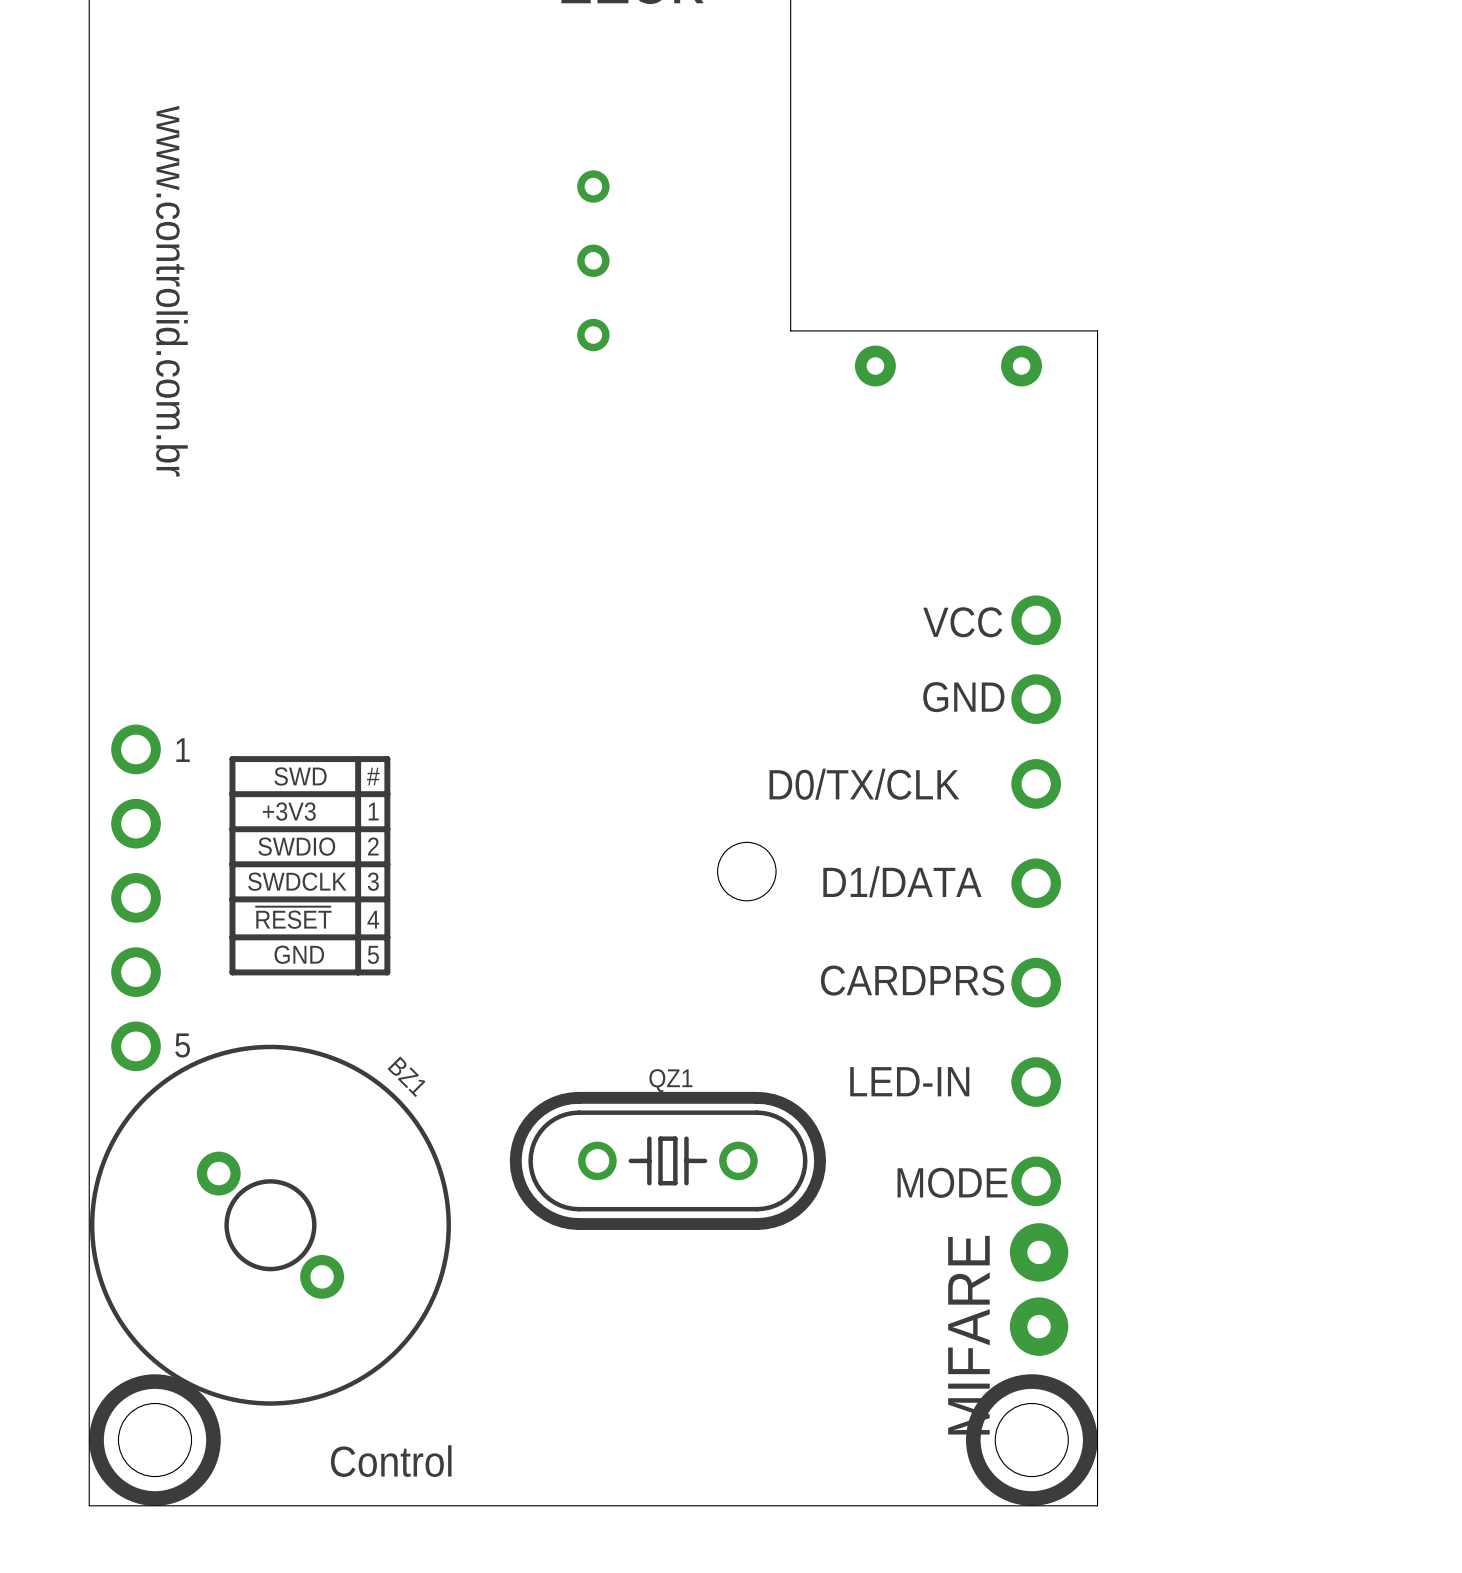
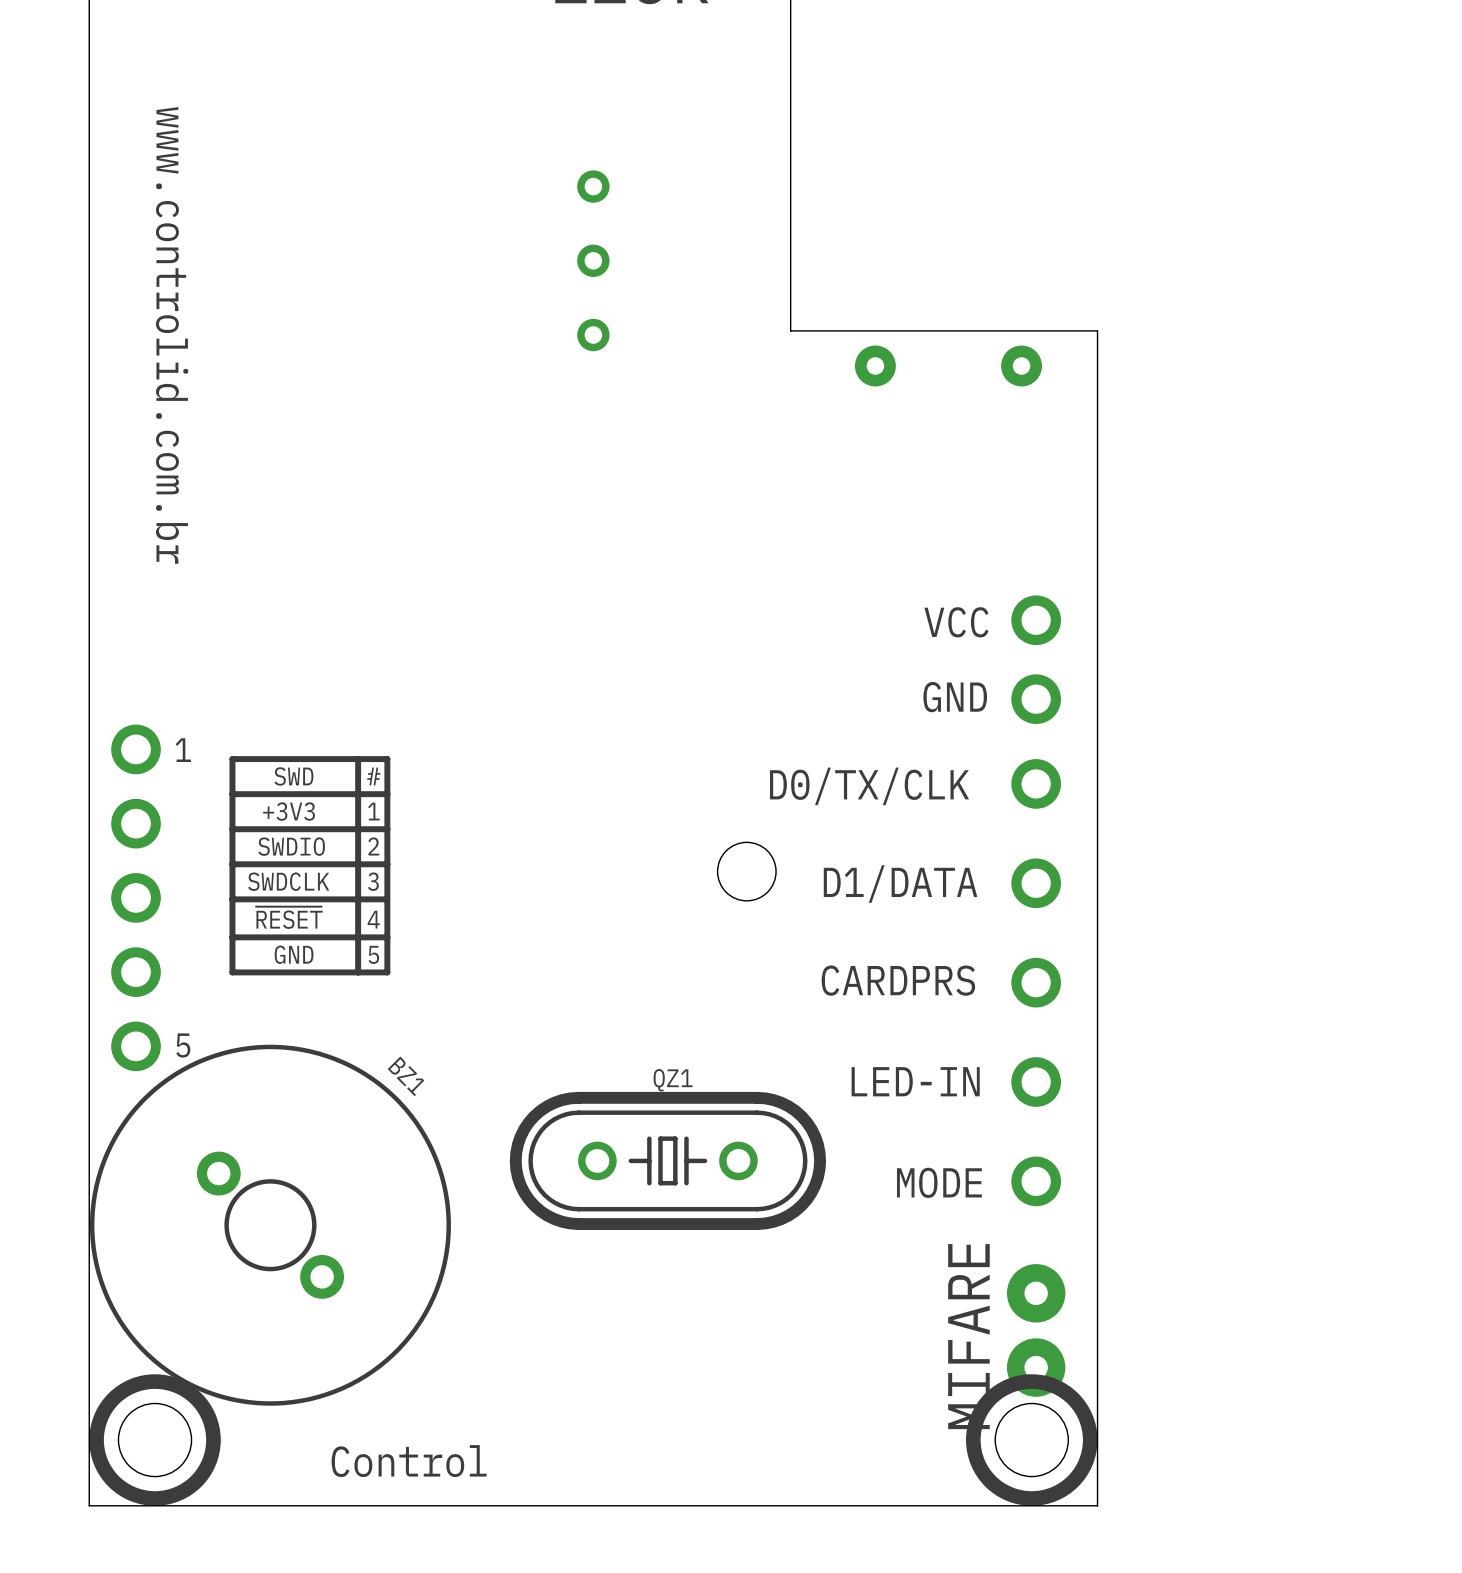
part position: (1039, 1289) -> (1036, 1330)

